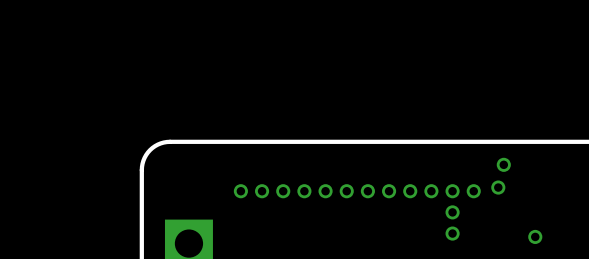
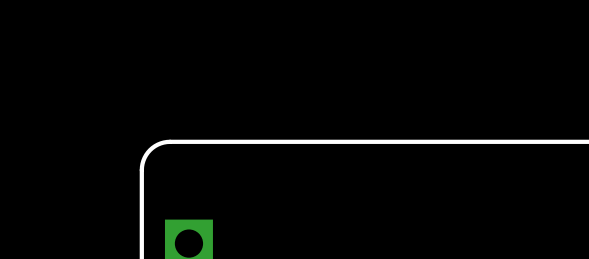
via: (503, 164) -> none
via: (498, 187) -> none
via: (240, 191) -> none
via: (262, 191) -> none
via: (283, 191) -> none
via: (304, 191) -> none
via: (325, 191) -> none
via: (346, 191) -> none
via: (367, 191) -> none
via: (389, 191) -> none
via: (410, 191) -> none
via: (431, 191) -> none
via: (452, 191) -> none
via: (473, 191) -> none
via: (452, 212) -> none
via: (452, 233) -> none
via: (535, 236) -> none

